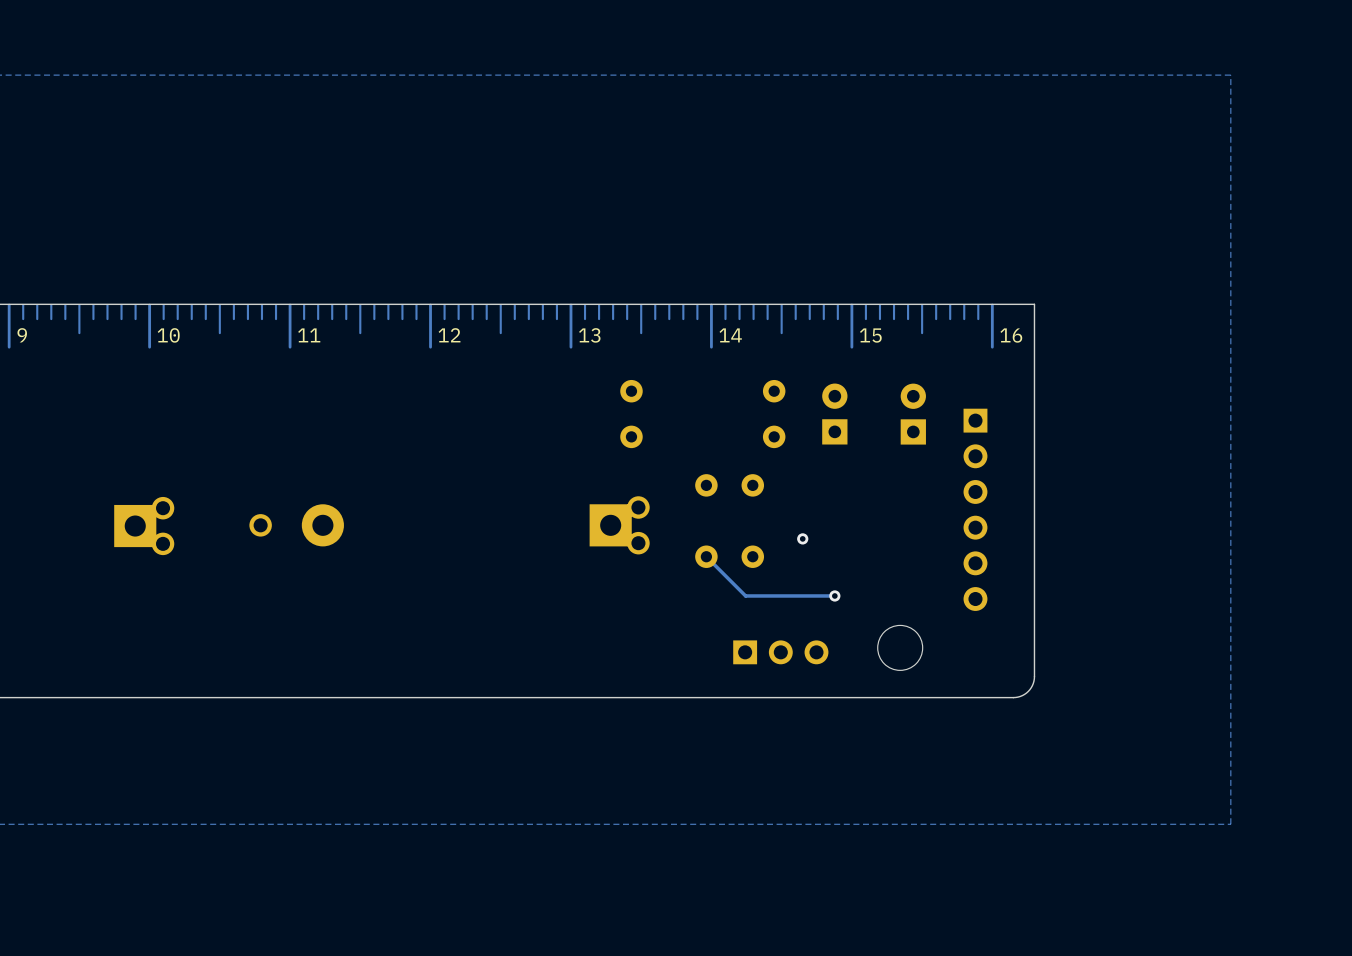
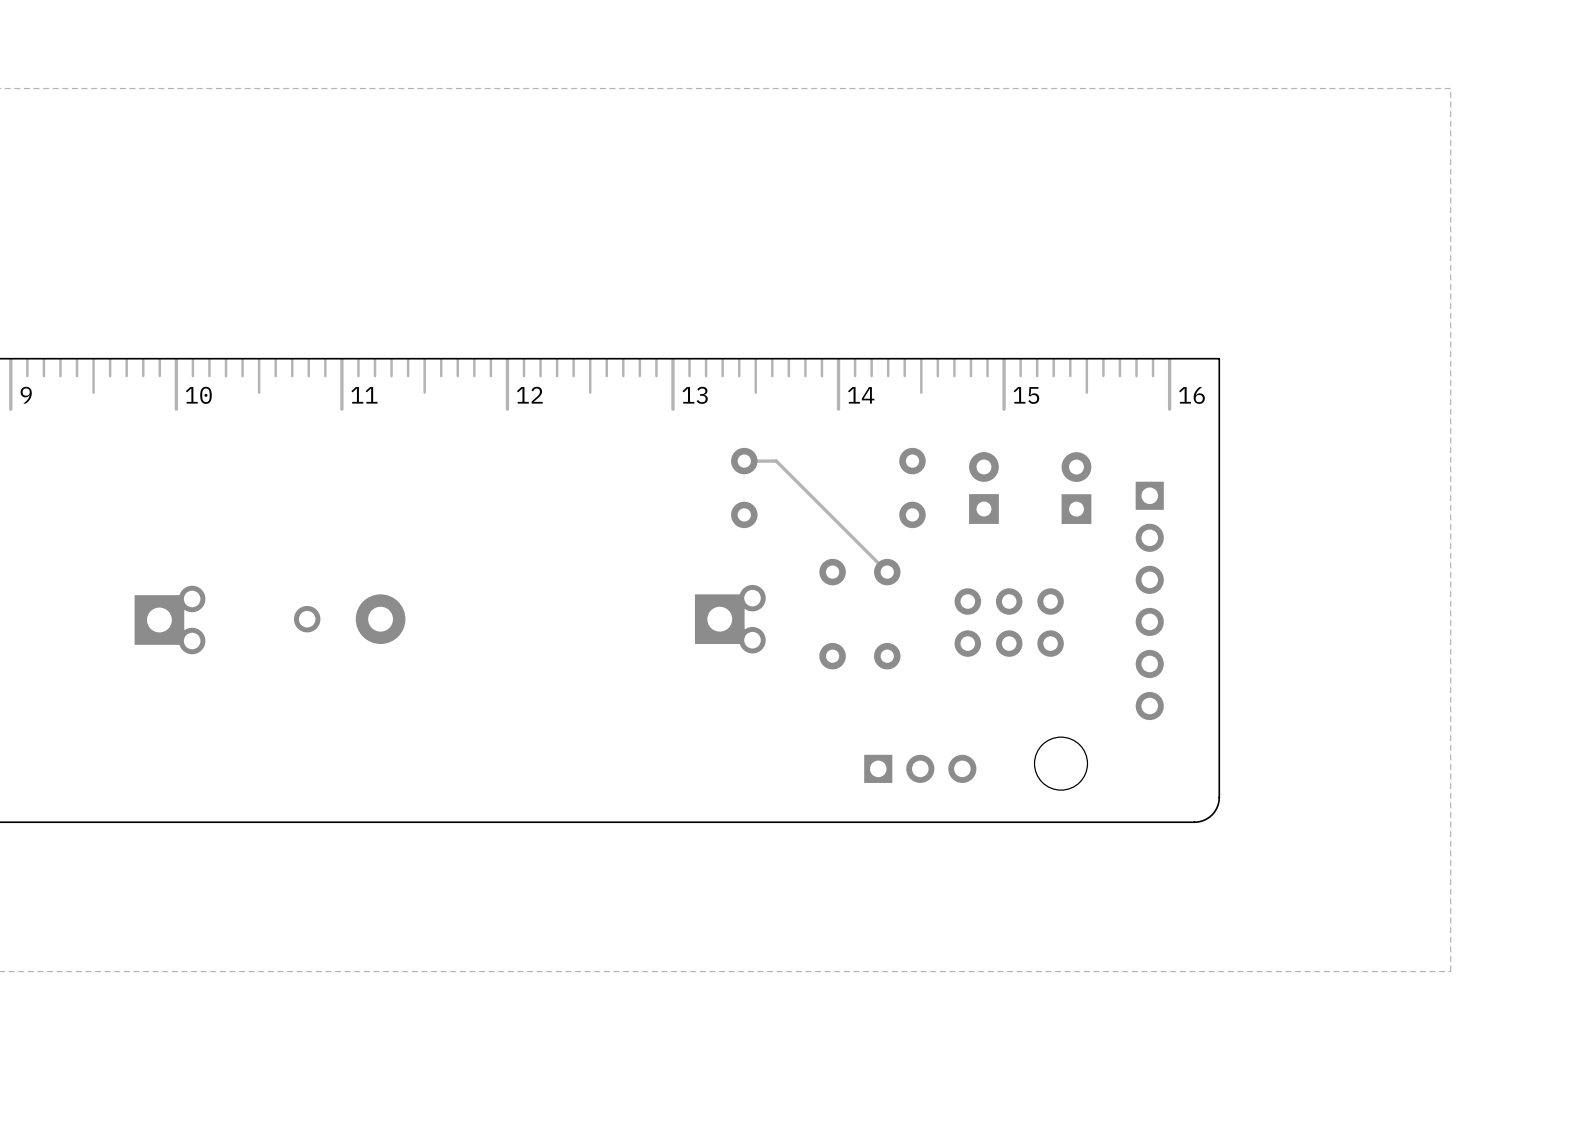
track: none -> (744, 461) (776, 461) (887, 572)
part: none -> (1009, 622)
via: (802, 538) -> none
track: (706, 556) (745, 595) (834, 595) -> none
via: (834, 595) -> none

